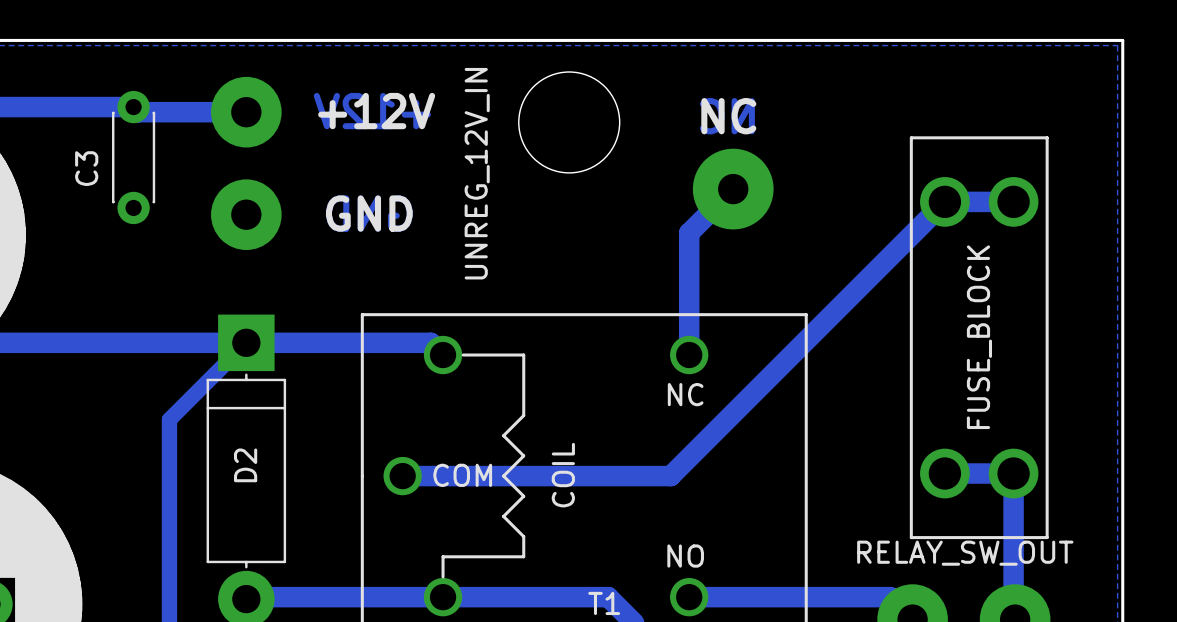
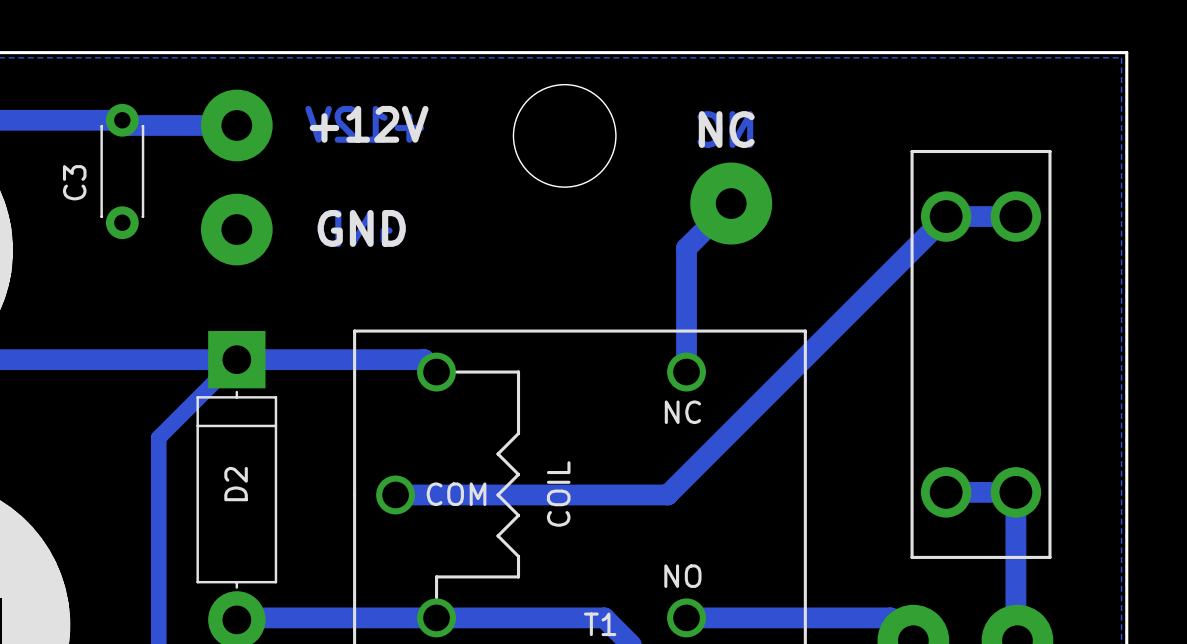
part value: UNREG_12V_IN (477, 173) -> none
part value: FUSE_BLOCK (979, 337) -> none
part value: RELAY_SW_OUT (965, 553) -> none

